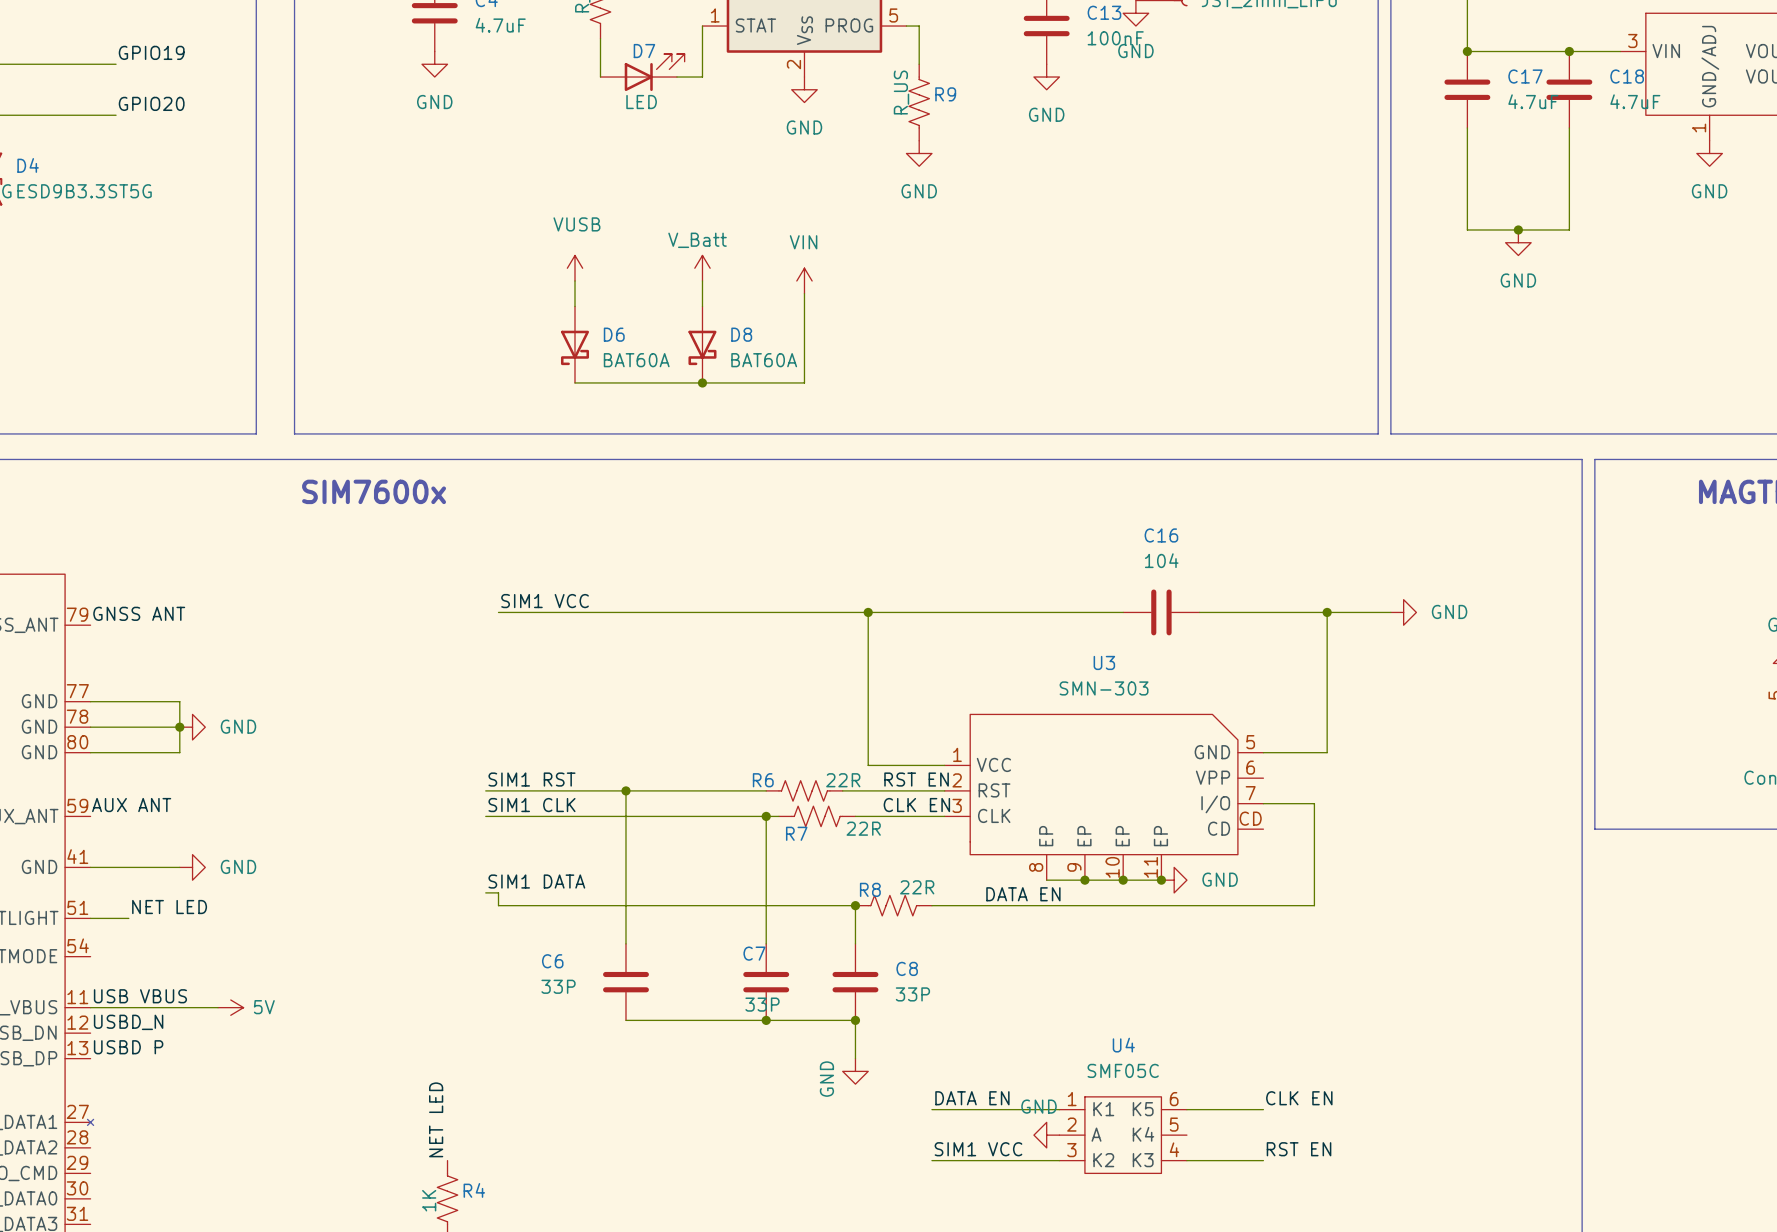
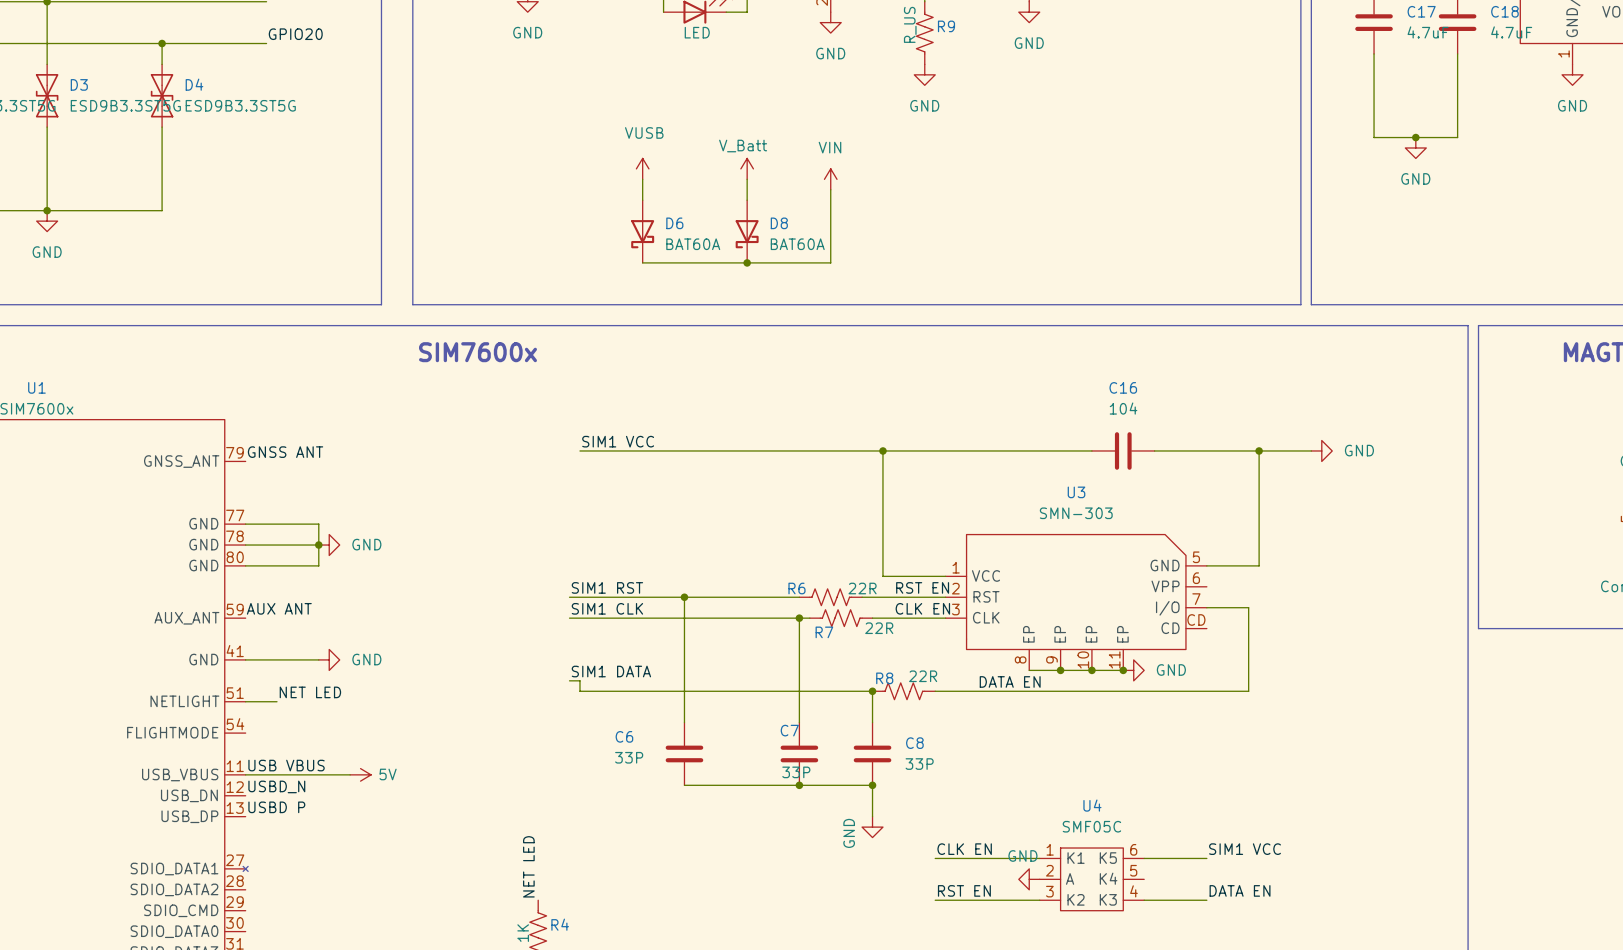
label: DATA EN (972, 1098) -> CLK EN (964, 849)
label: CLK EN (1299, 1098) -> SIM1 VCC (1245, 849)
label: SIM1 VCC (978, 1149) -> RST EN (964, 890)
label: RST EN (1299, 1149) -> DATA EN (1240, 890)

